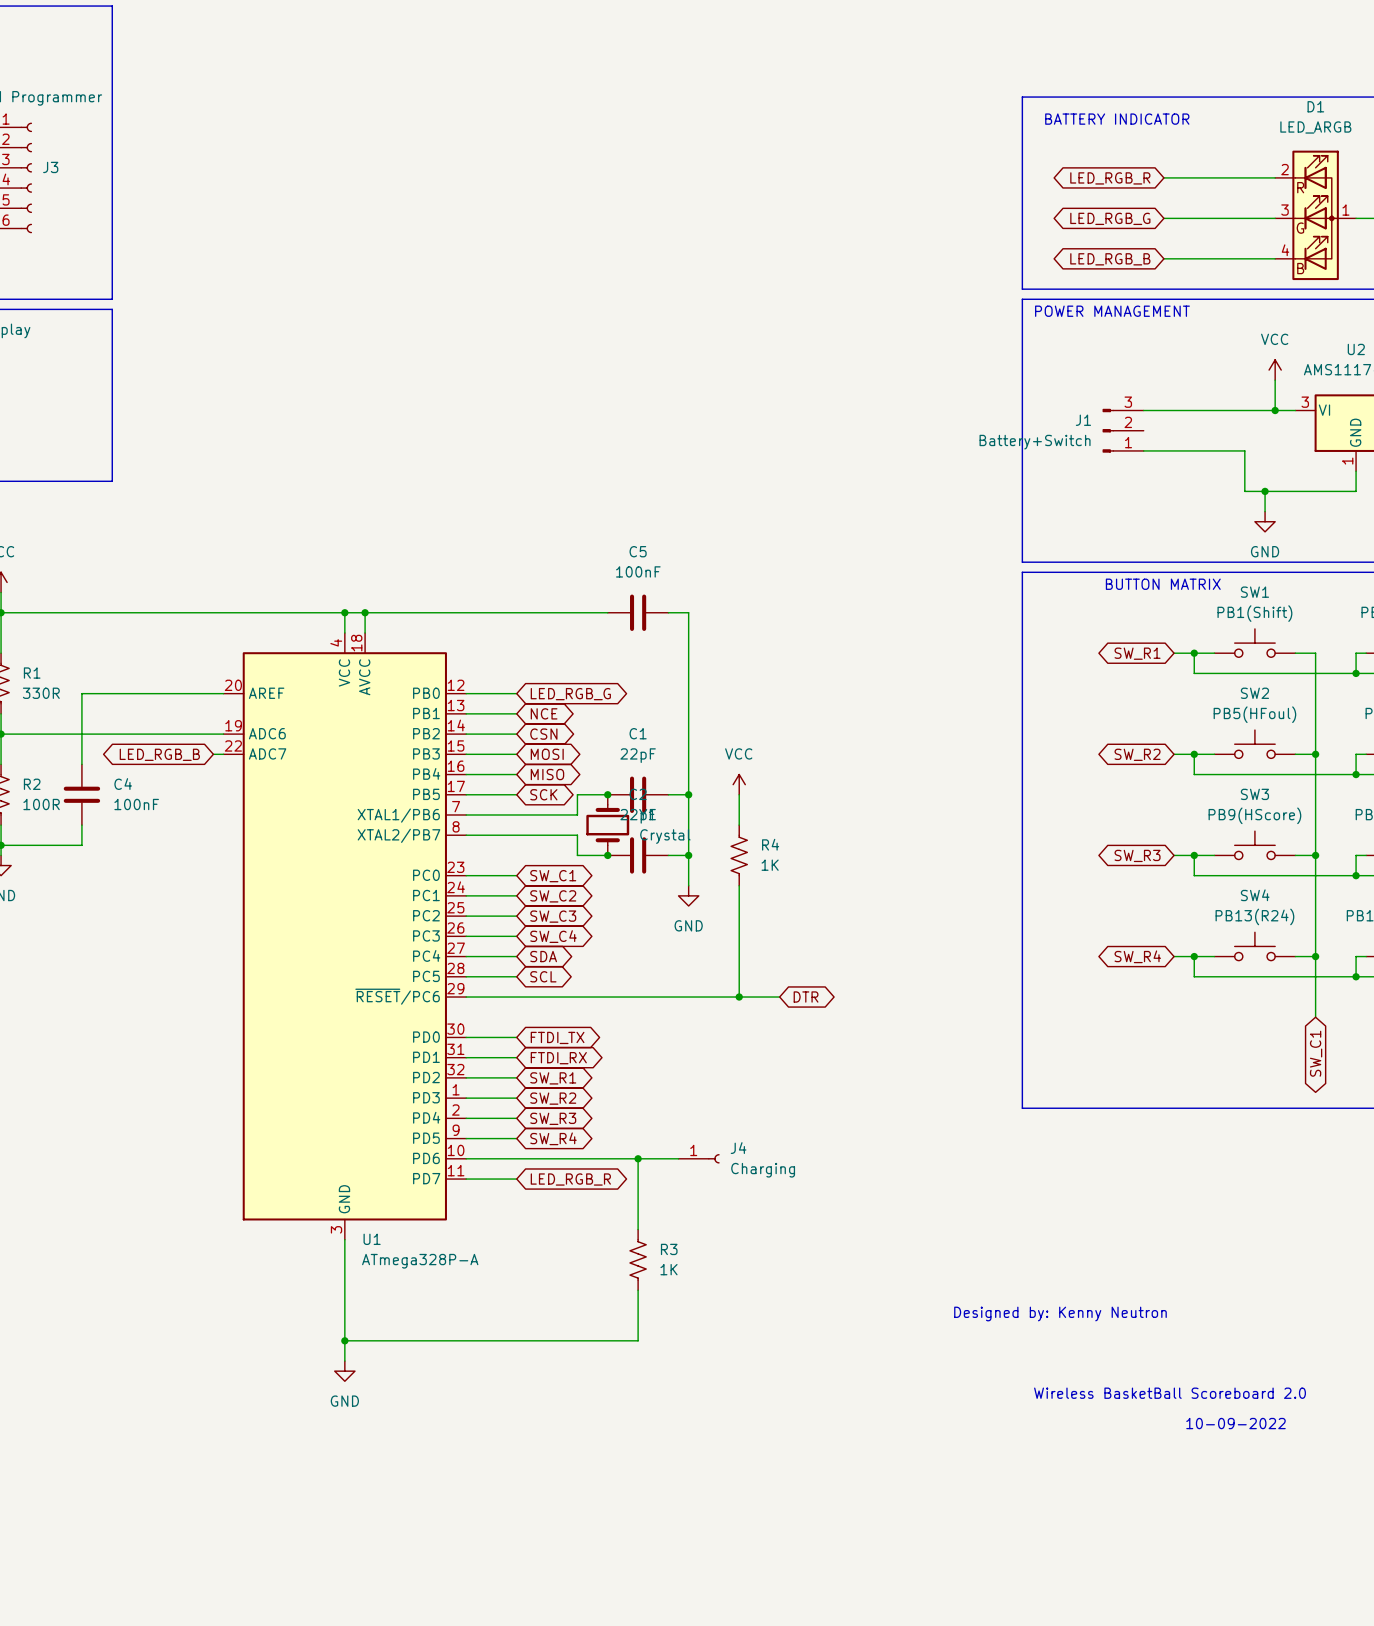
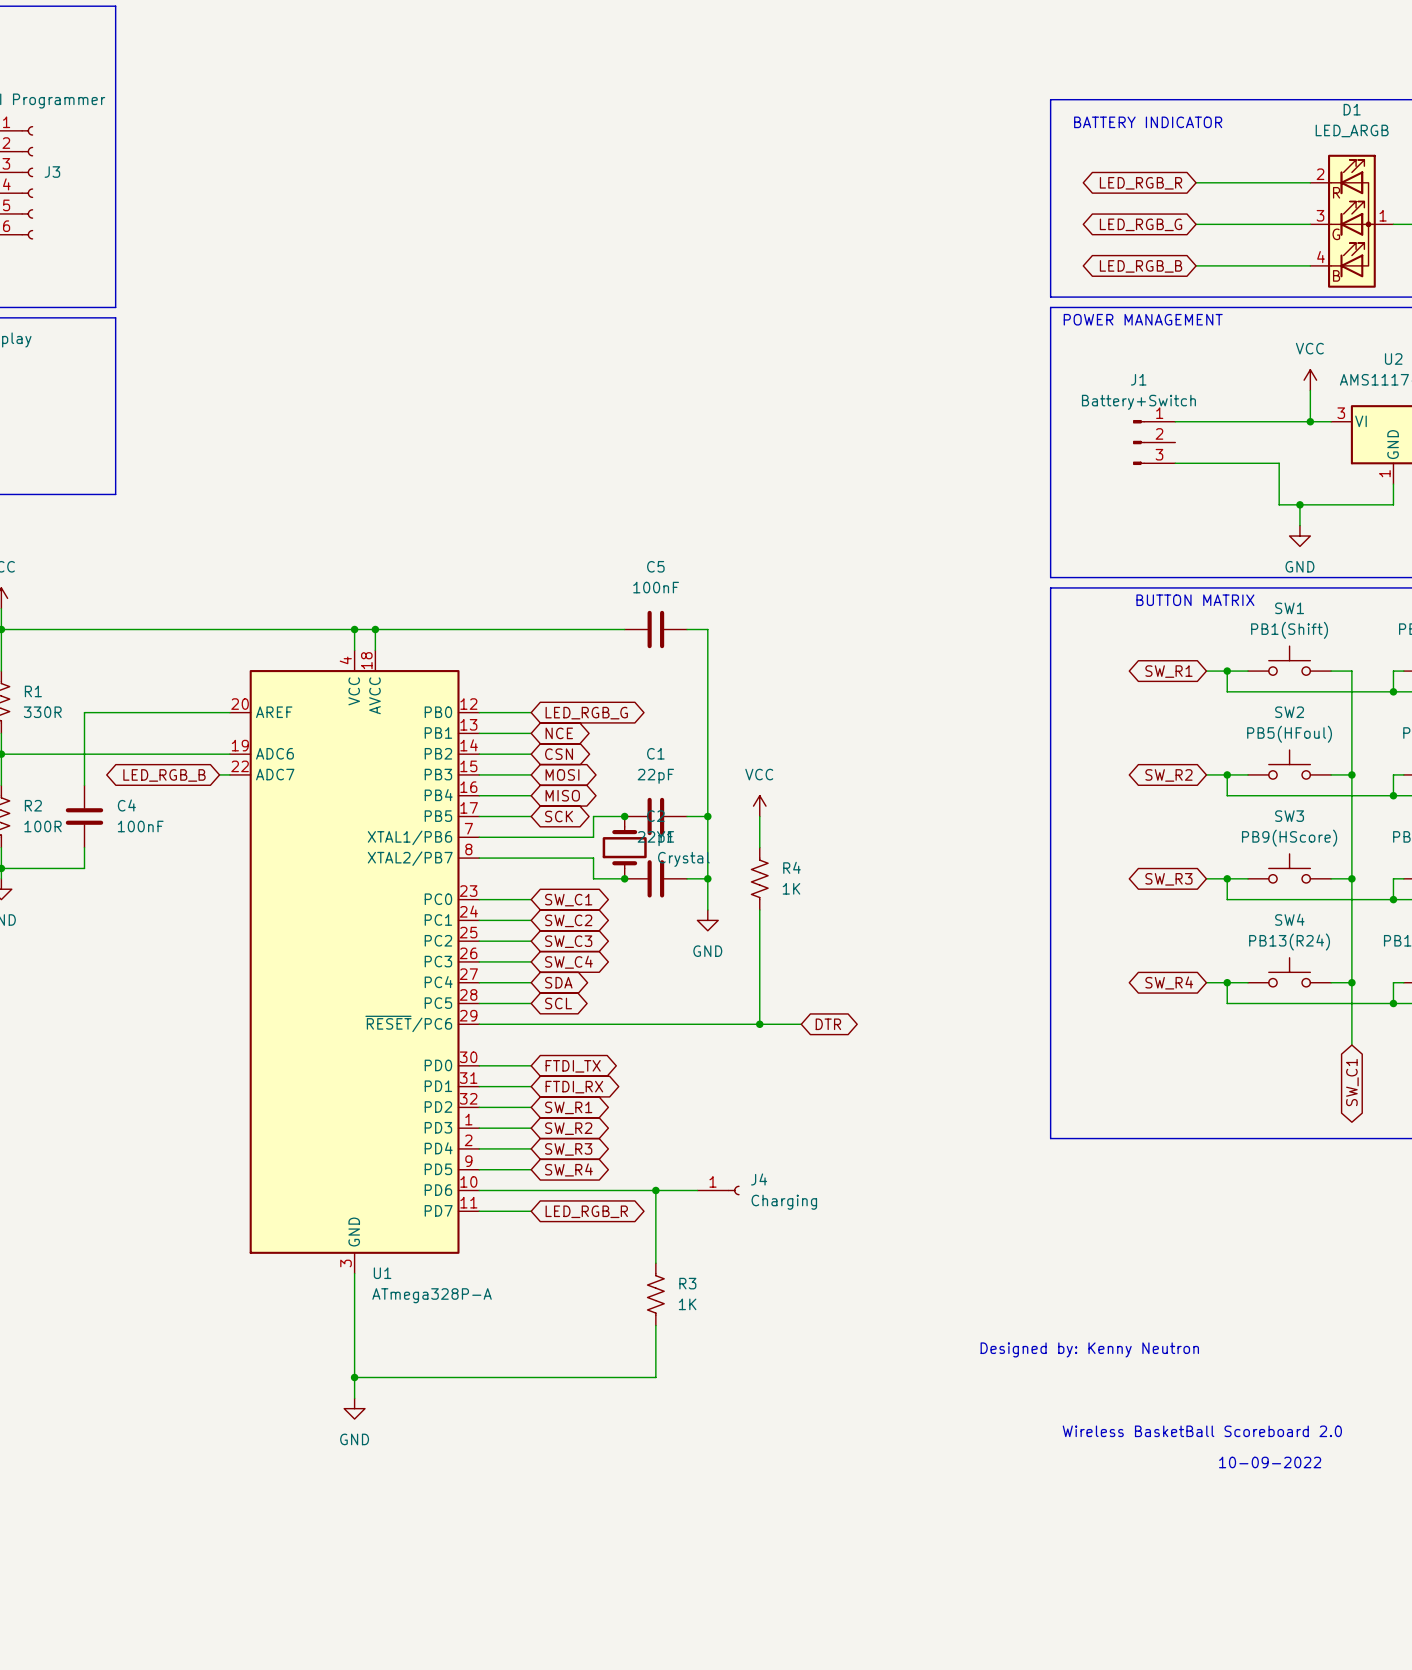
J1 name position: J1 (1083, 420) -> J1 (1138, 379)
J1 flip: as is (1108, 430) -> up-down (1138, 442)
J1 value position: Battery+Switch (1035, 442) -> Battery+Switch (1138, 402)

